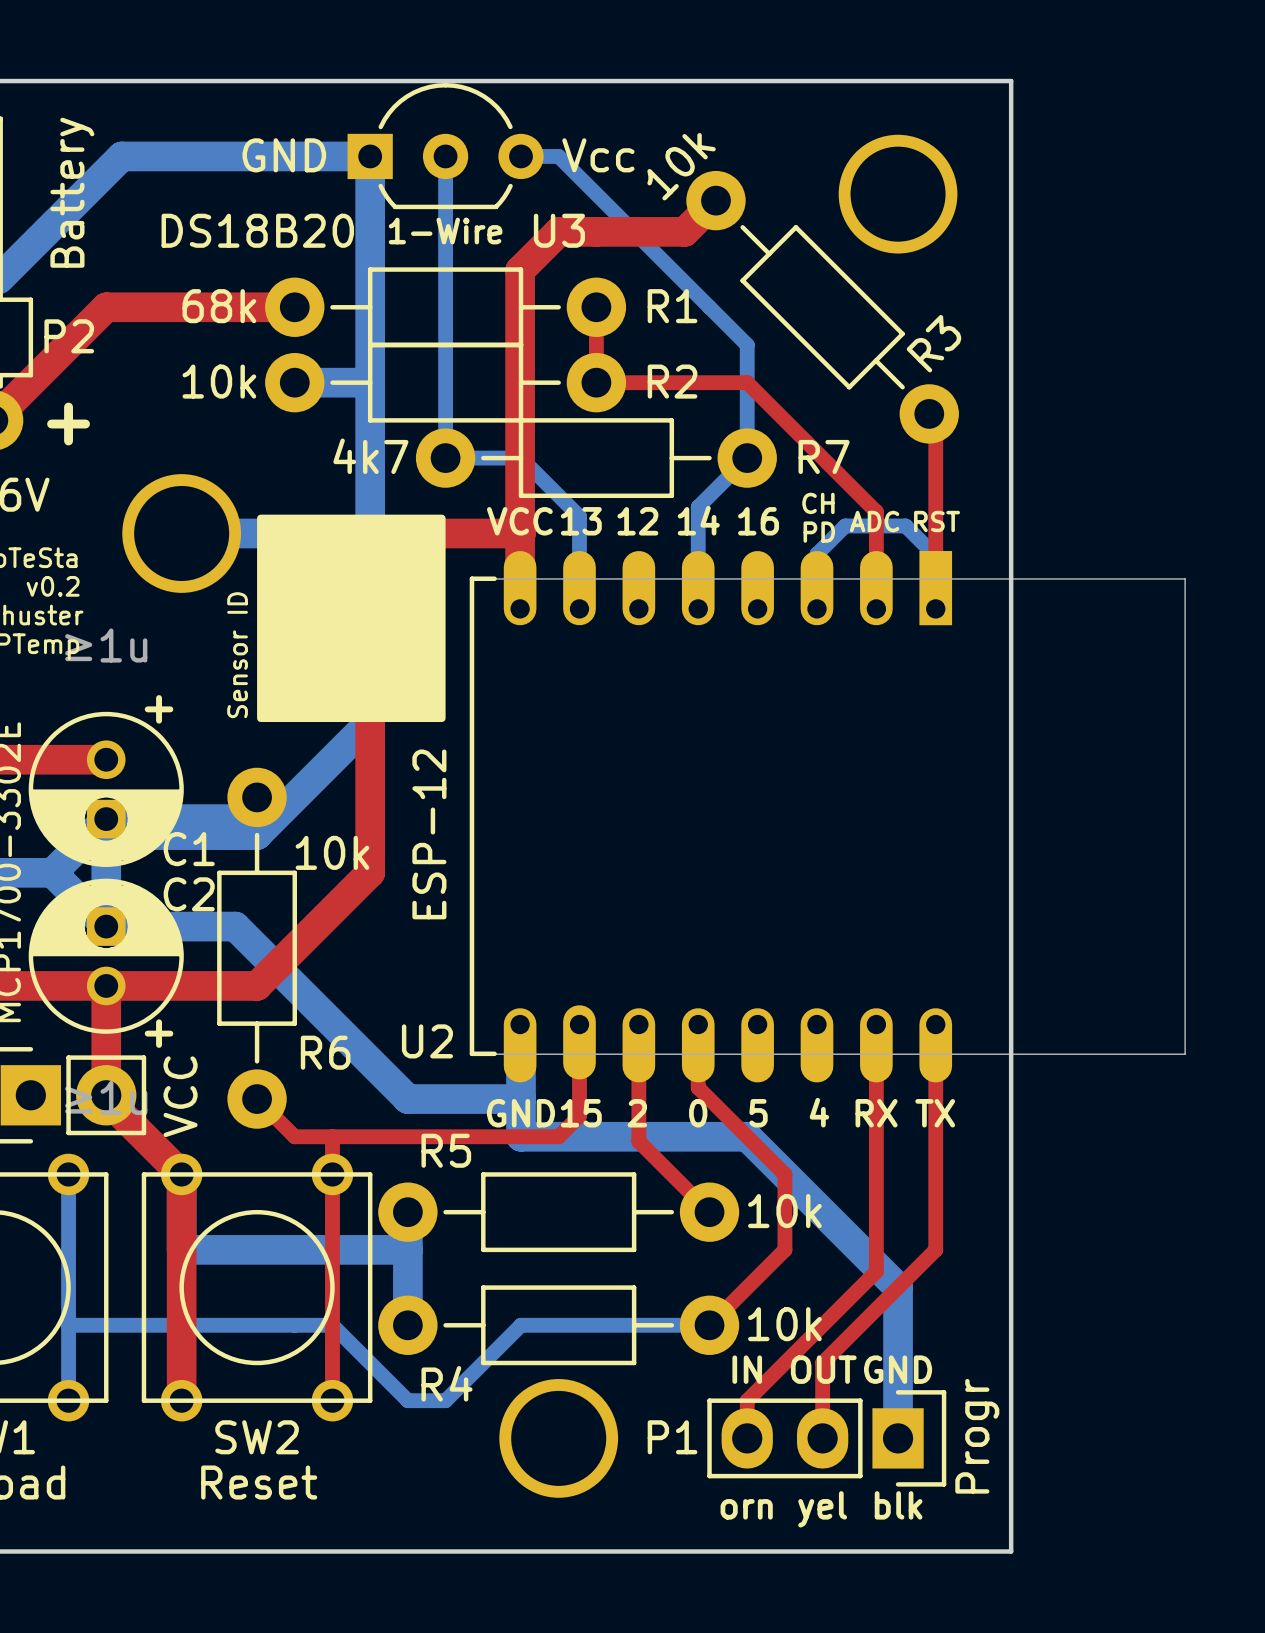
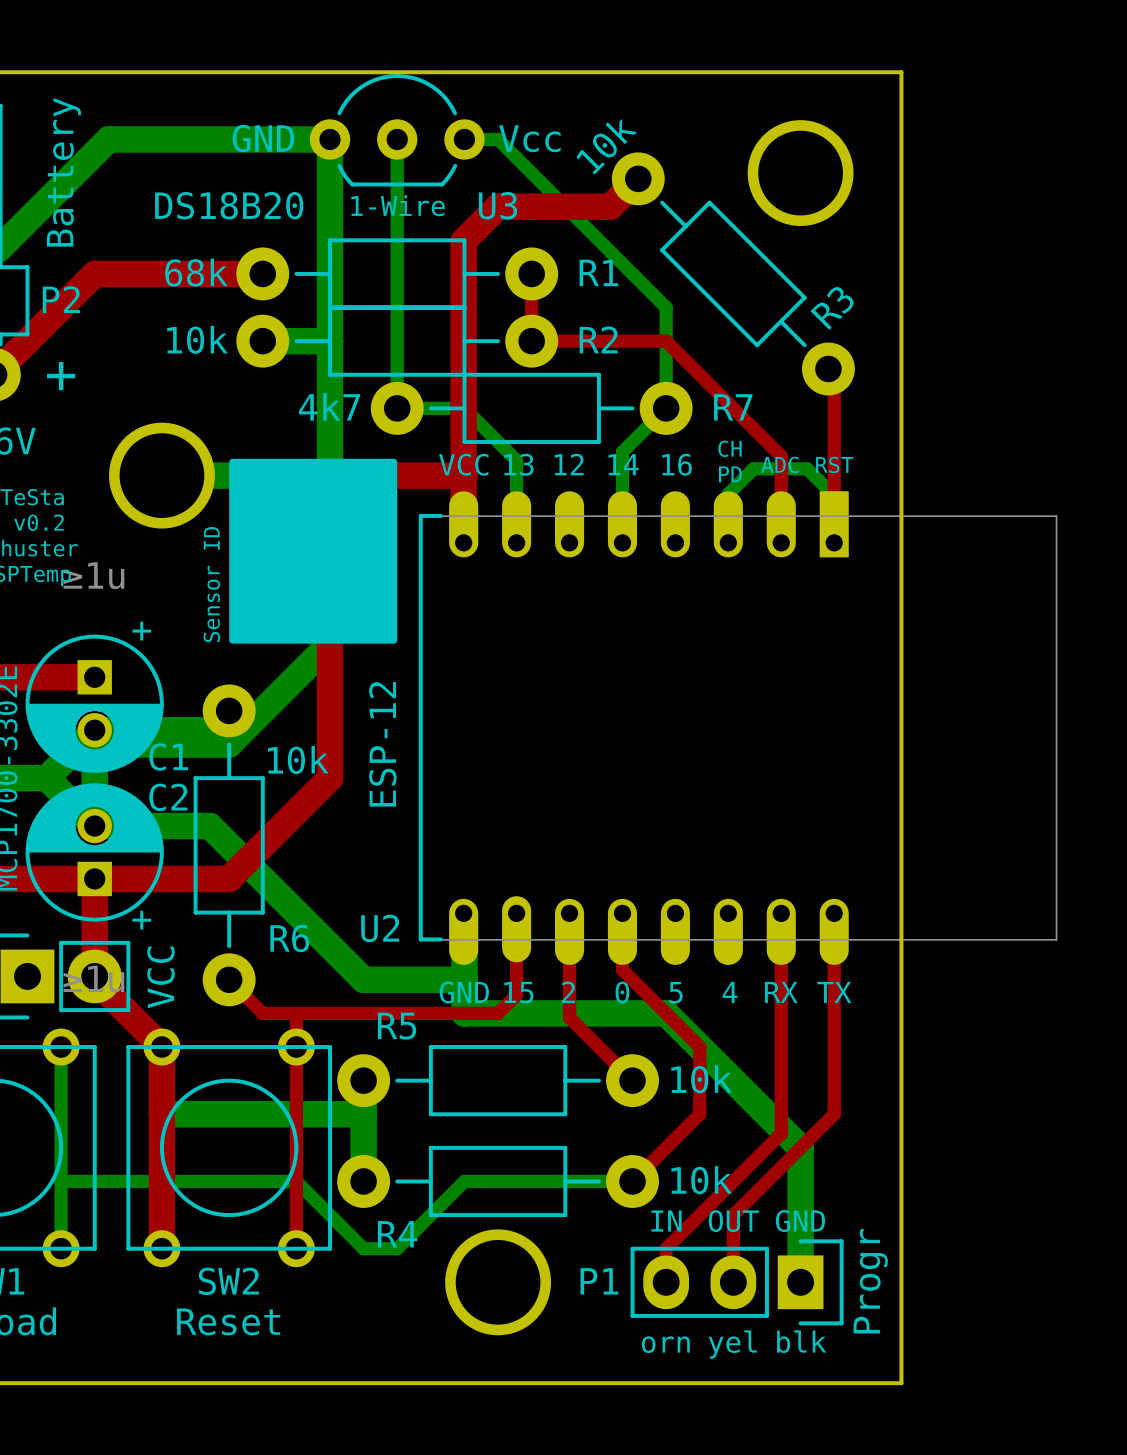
U3 footprint: [347, 82, 544, 210] -> [309, 73, 485, 187]
C1 footprint: [28, 711, 184, 867] -> [25, 634, 164, 773]
C2 footprint: [28, 878, 184, 1034] -> [25, 783, 164, 922]

